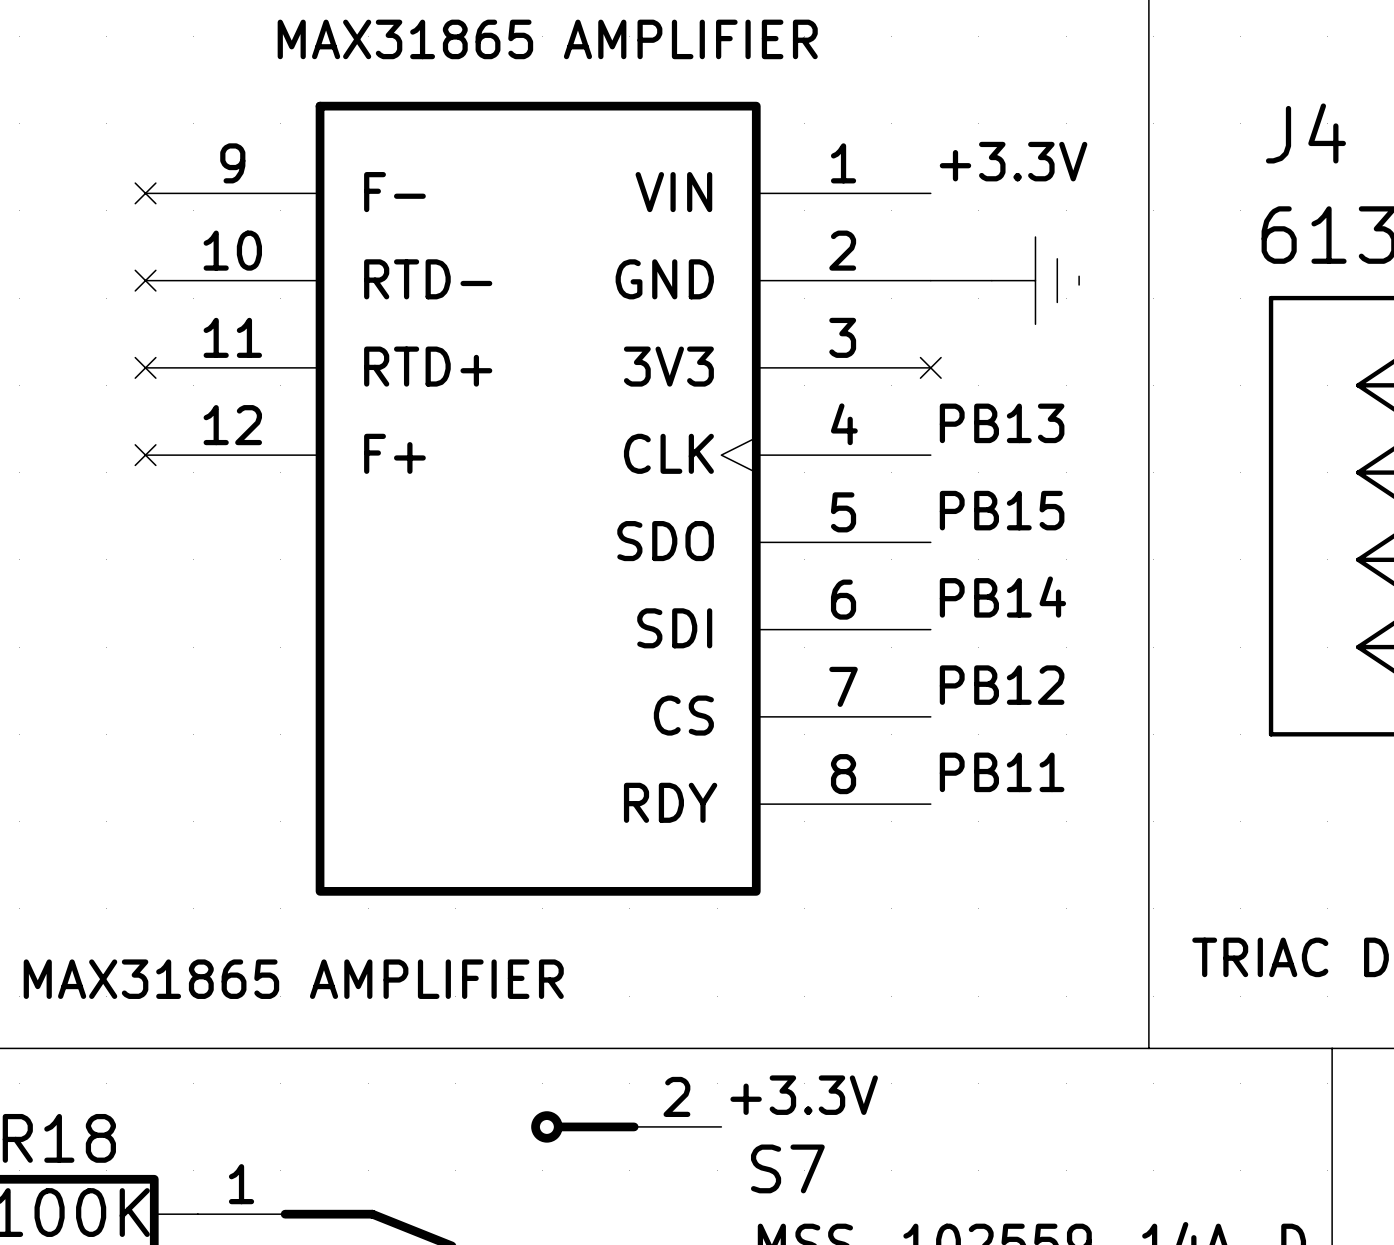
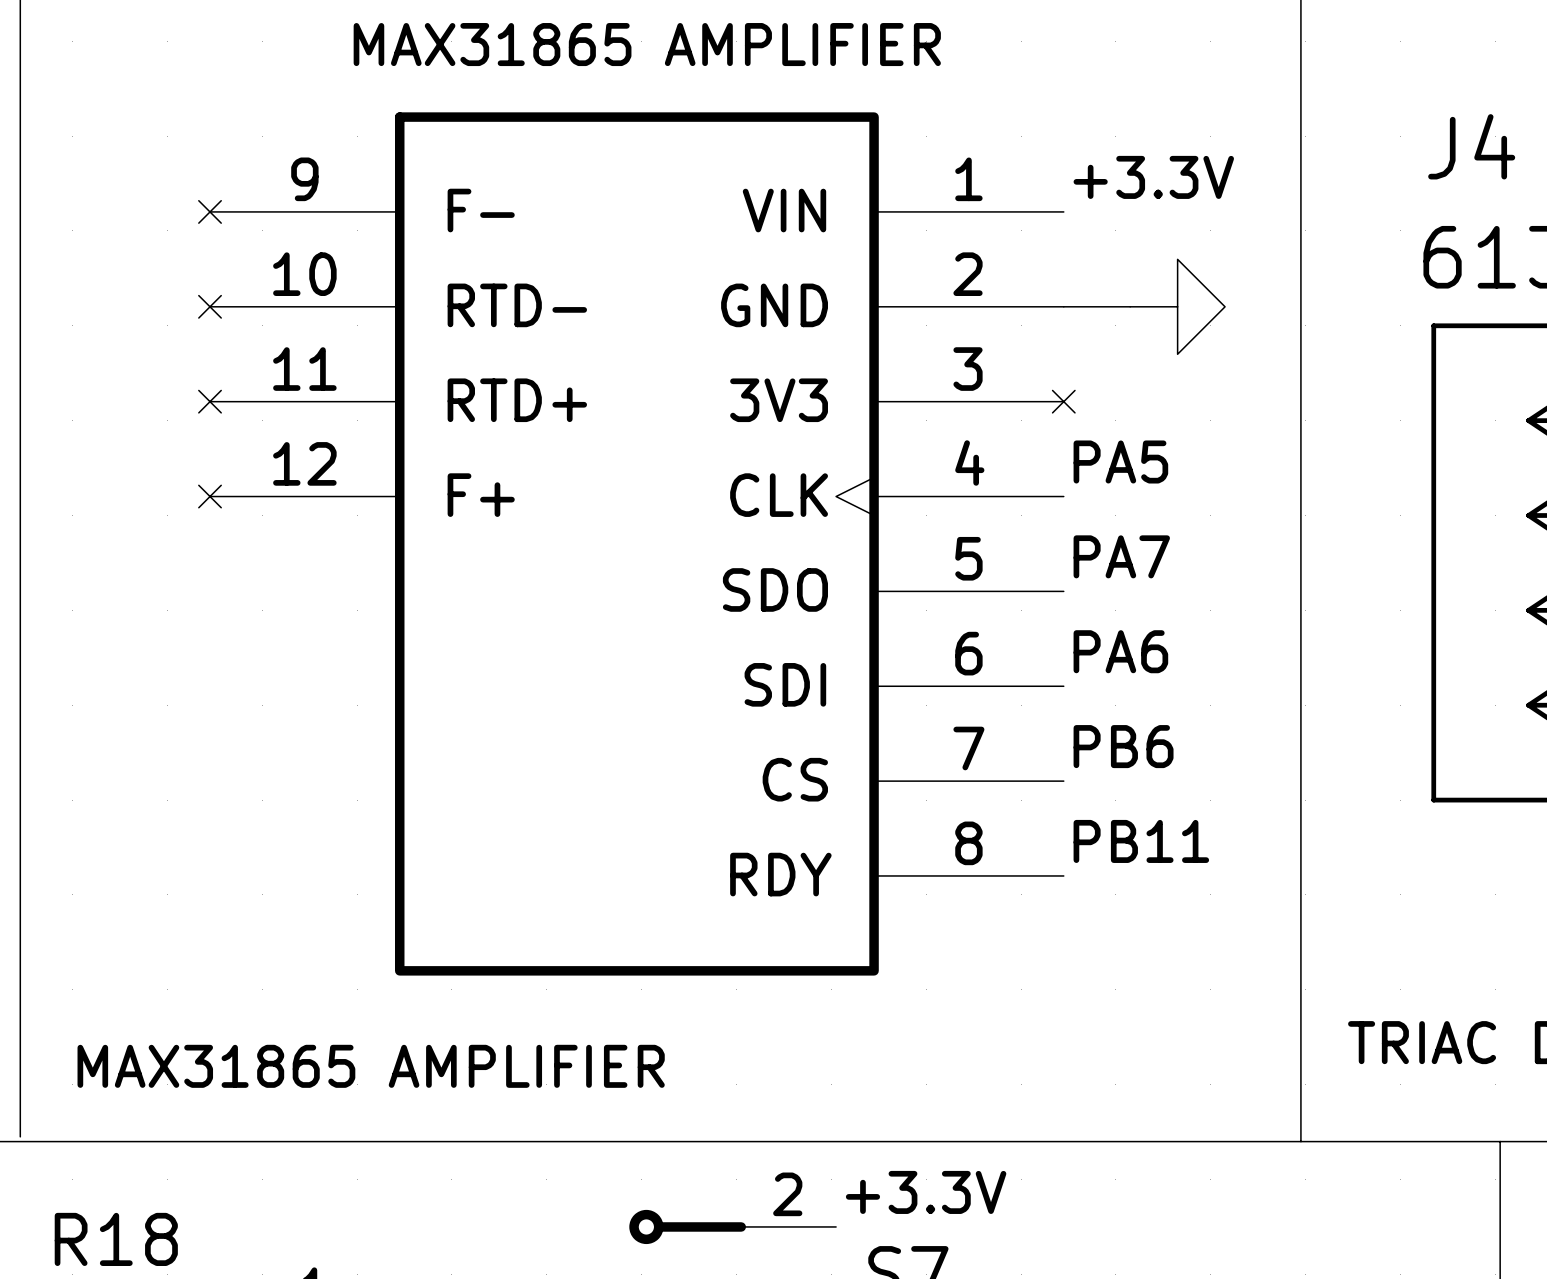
power symbol shape: [991, 237, 1080, 325] -> [1130, 259, 1226, 355]
label: PB13 (1002, 423) -> PA5 (1120, 461)
label: PB15 (1002, 510) -> PA7 (1121, 556)
label: PB14 (1002, 597) -> PA6 (1120, 651)
label: PB12 (1002, 685) -> PB6 (1123, 746)

